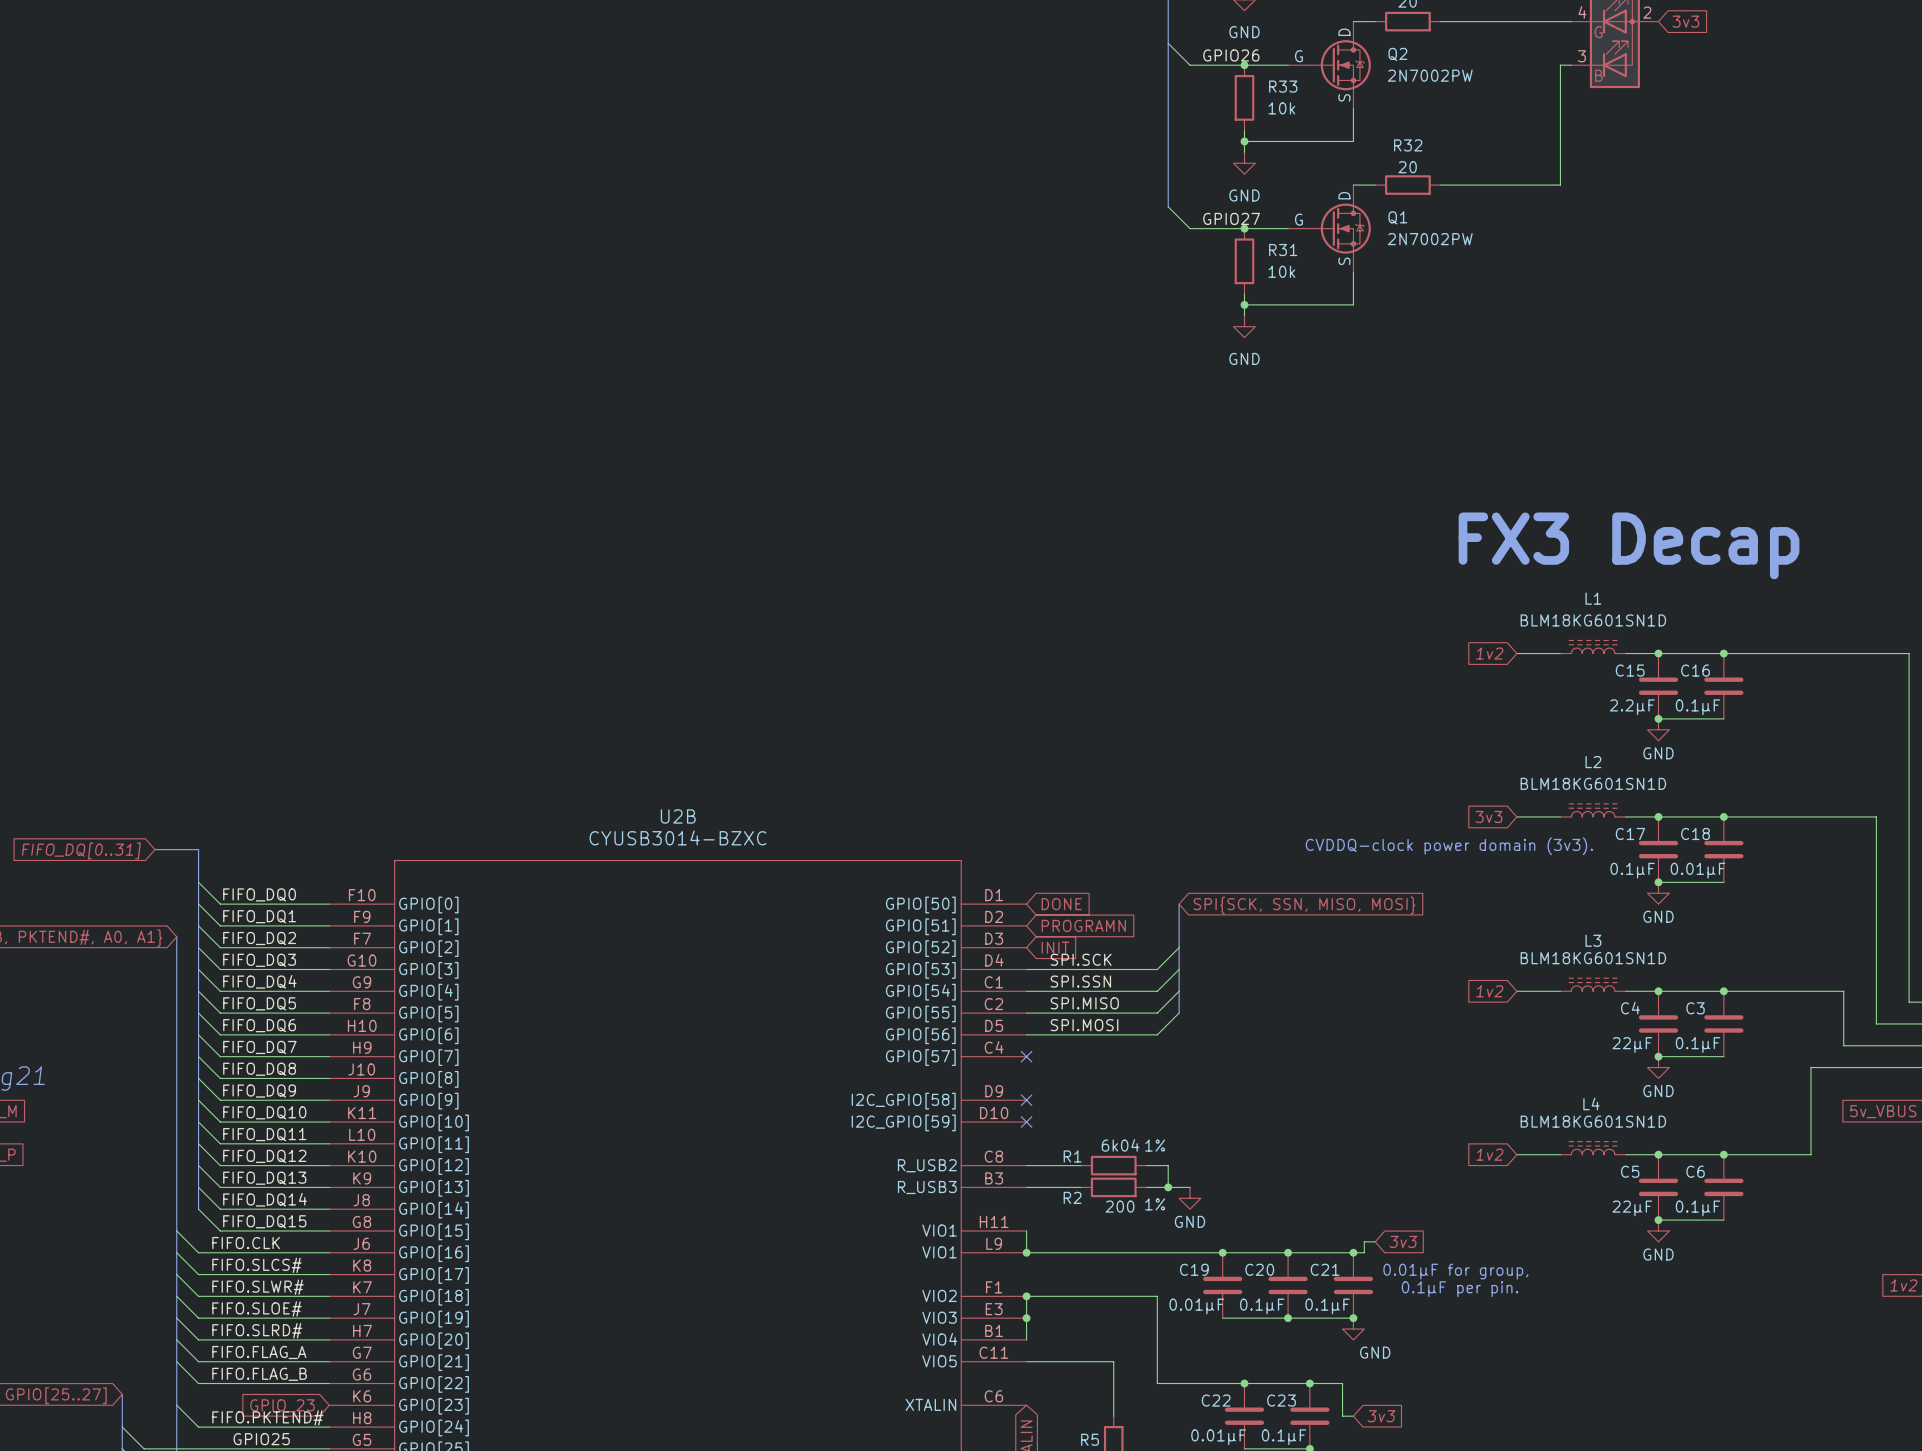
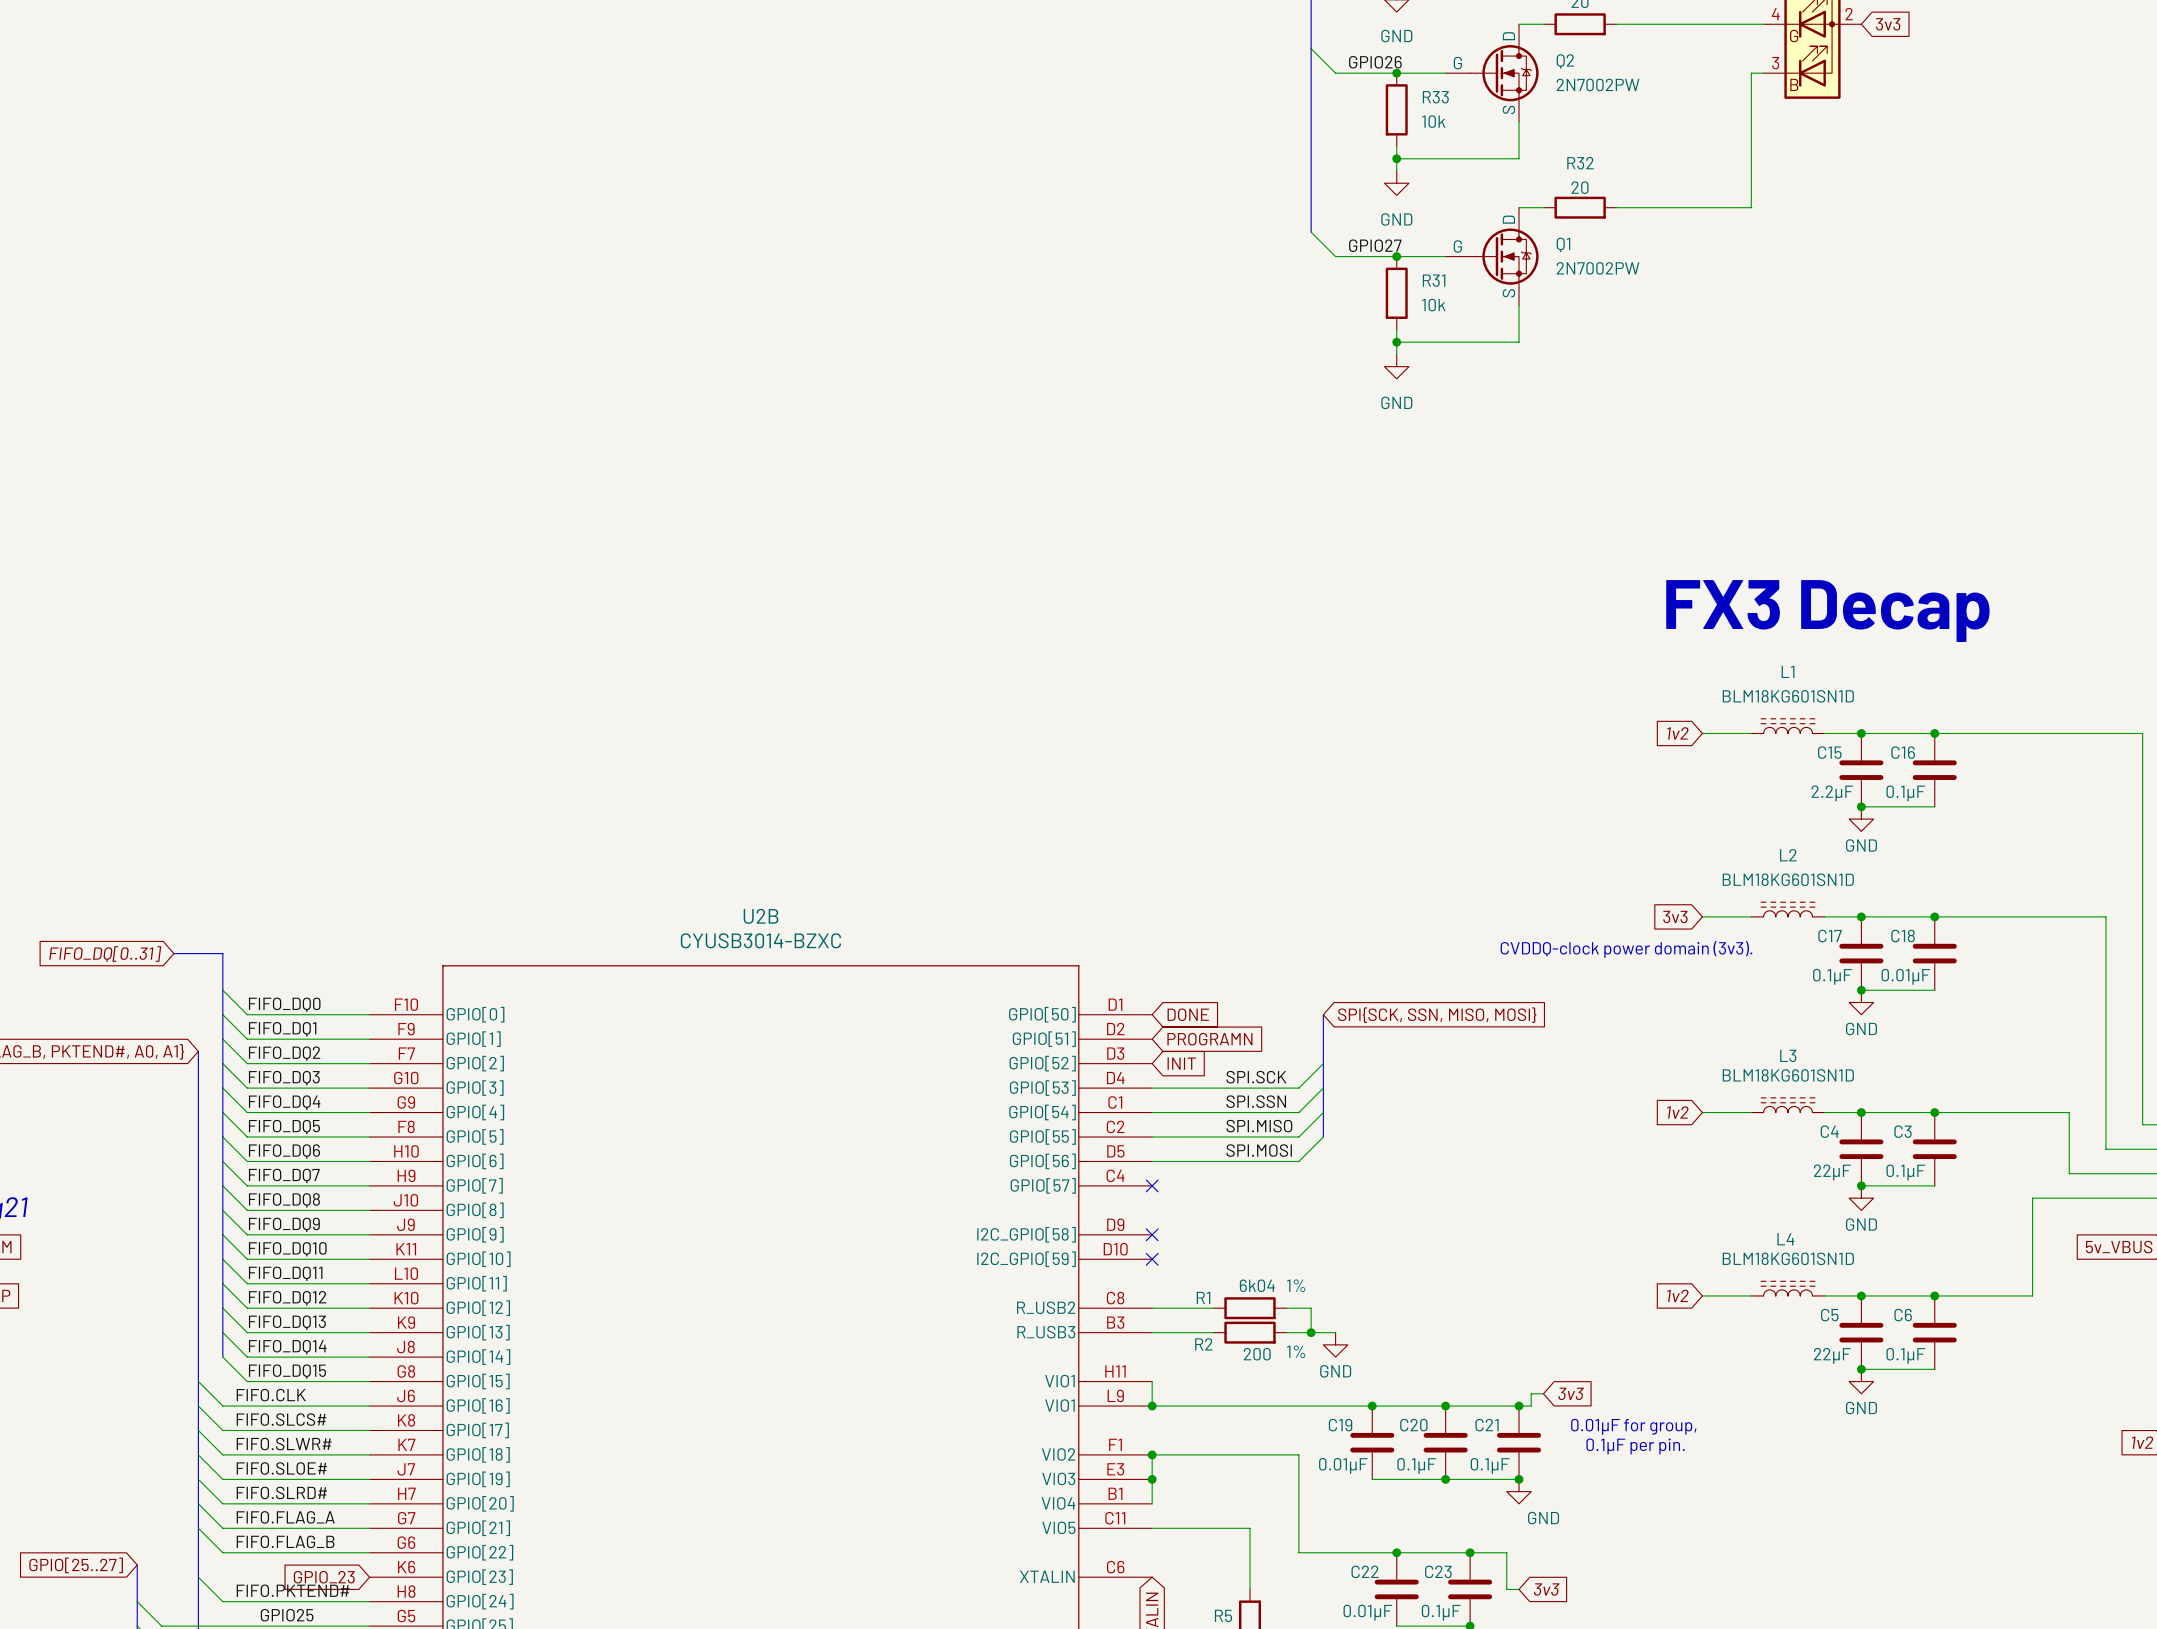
label position: SPI.SCK (1081, 959) -> SPI.SCK (1256, 1077)
label position: SPI.SSN (1080, 981) -> SPI.SSN (1256, 1101)
label position: SPI.MISO (1084, 1003) -> SPI.MISO (1259, 1126)
label position: SPI.MOSI (1084, 1025) -> SPI.MOSI (1259, 1150)

